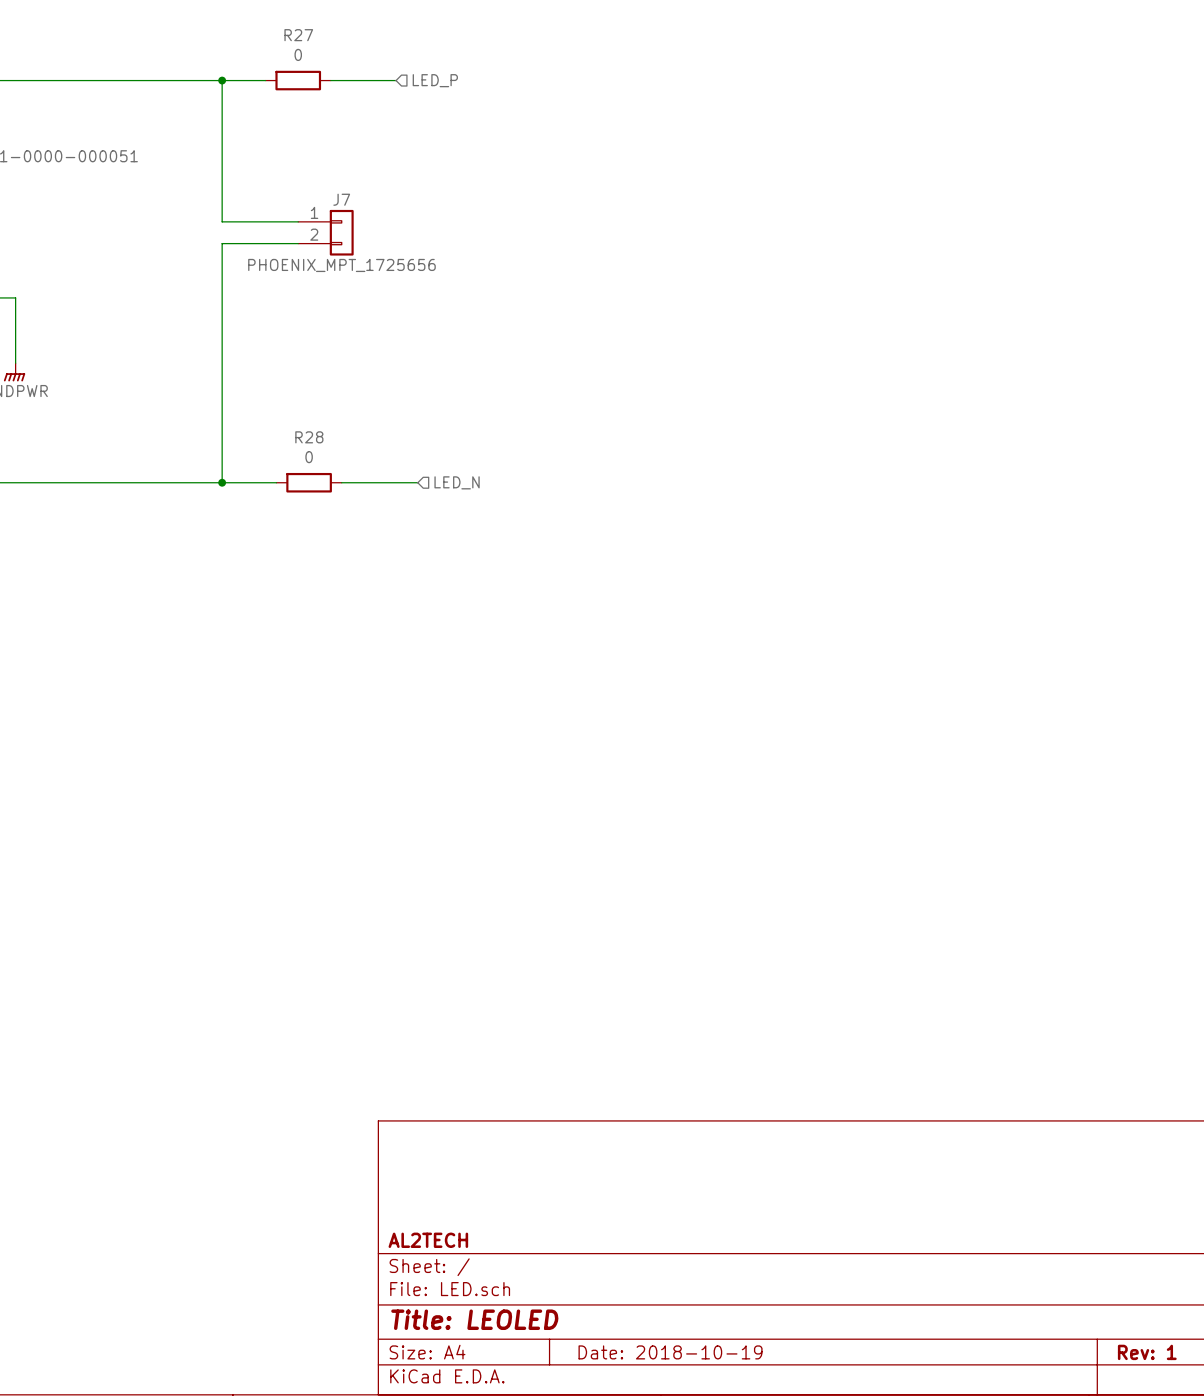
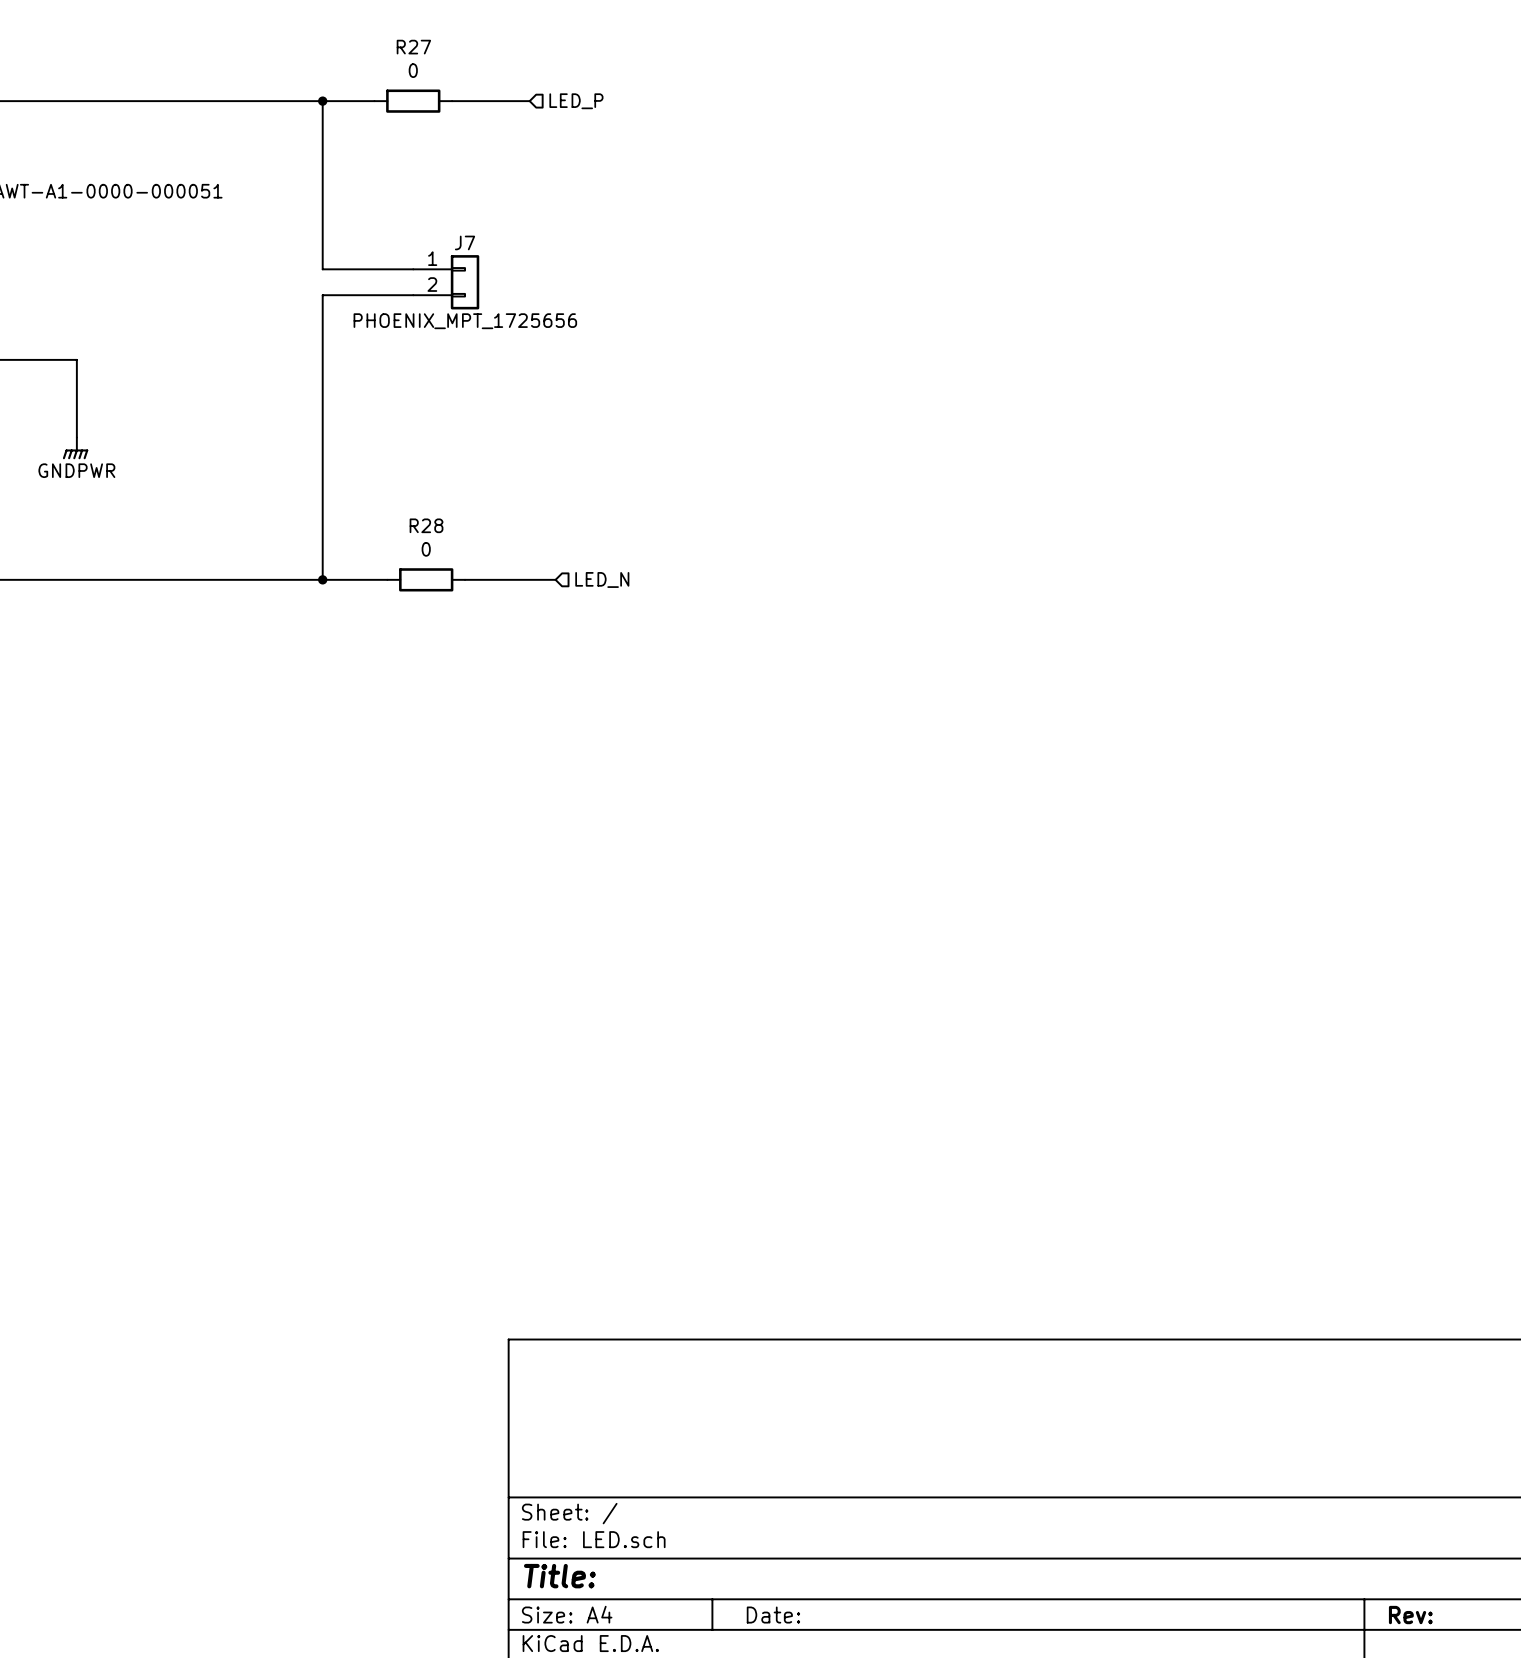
title block: AL2TECH (428, 1240) -> none
title block: Title: LEOLED (474, 1319) -> Title: (559, 1576)
title block: Date: 2018-10-19 (670, 1352) -> Date: (773, 1615)
title block: Rev: 1 (1147, 1352) -> Rev: (1410, 1615)

